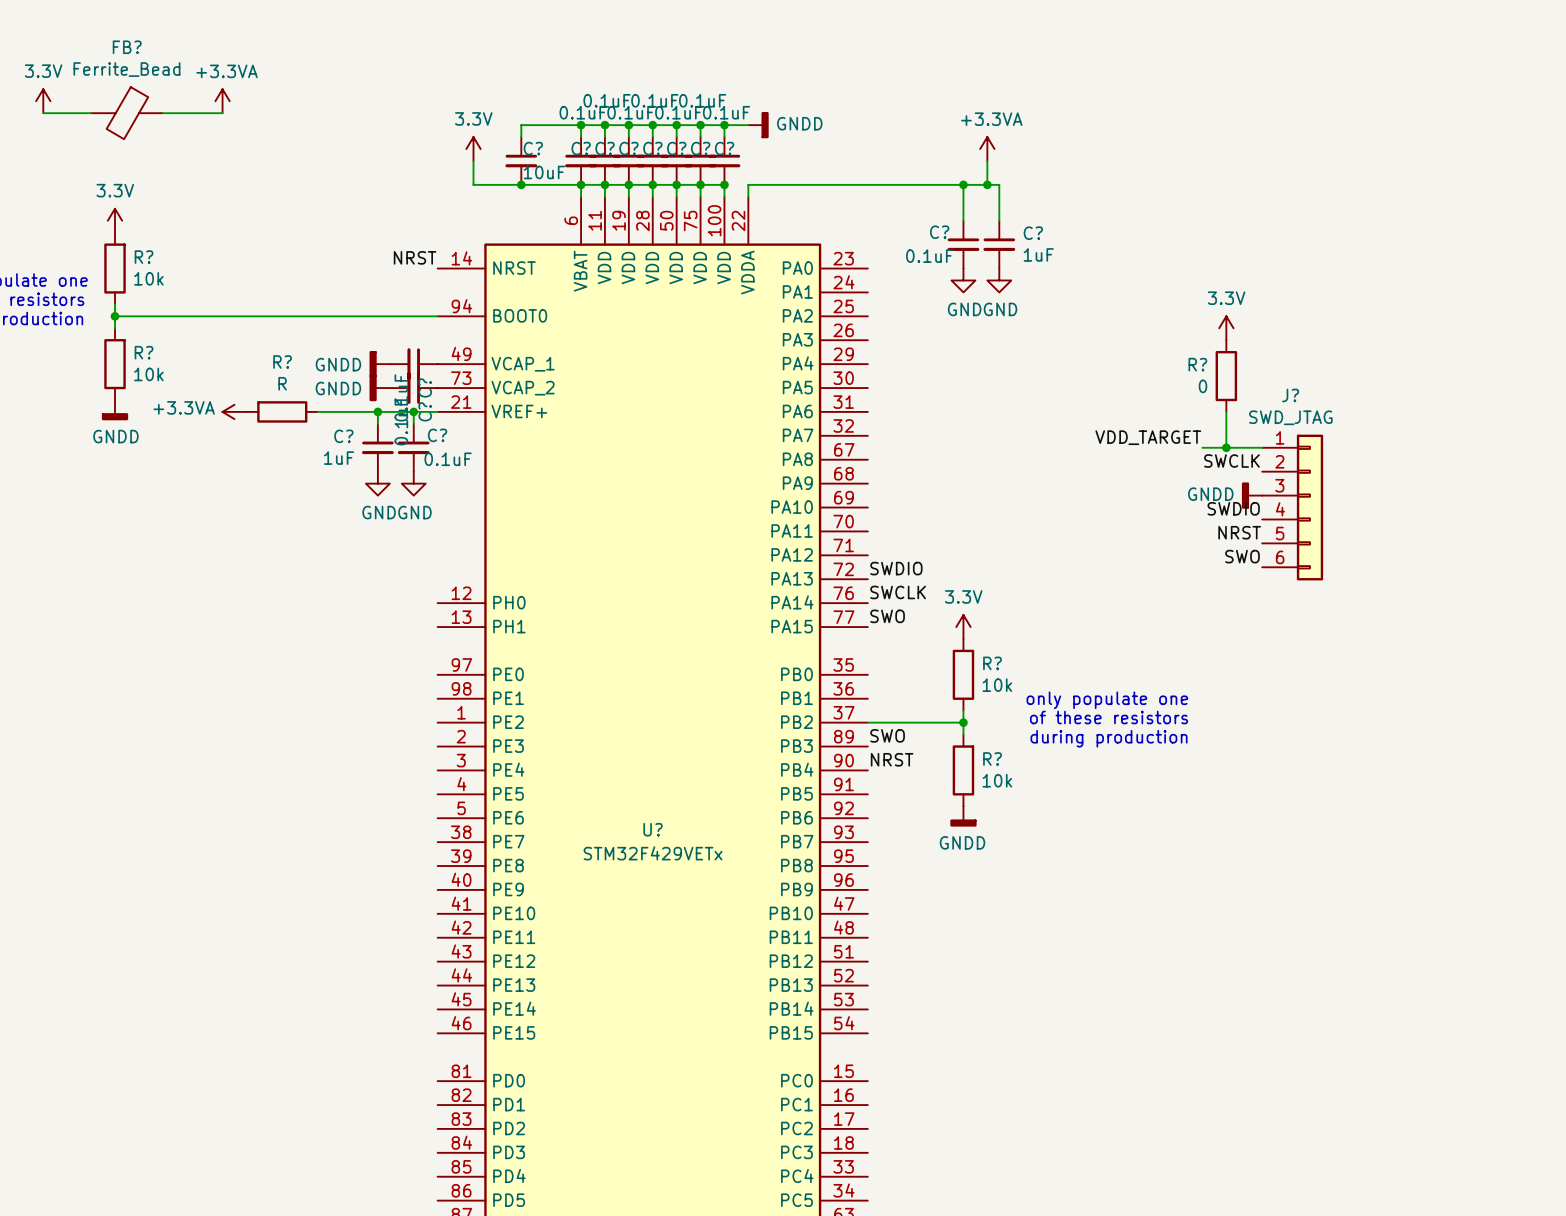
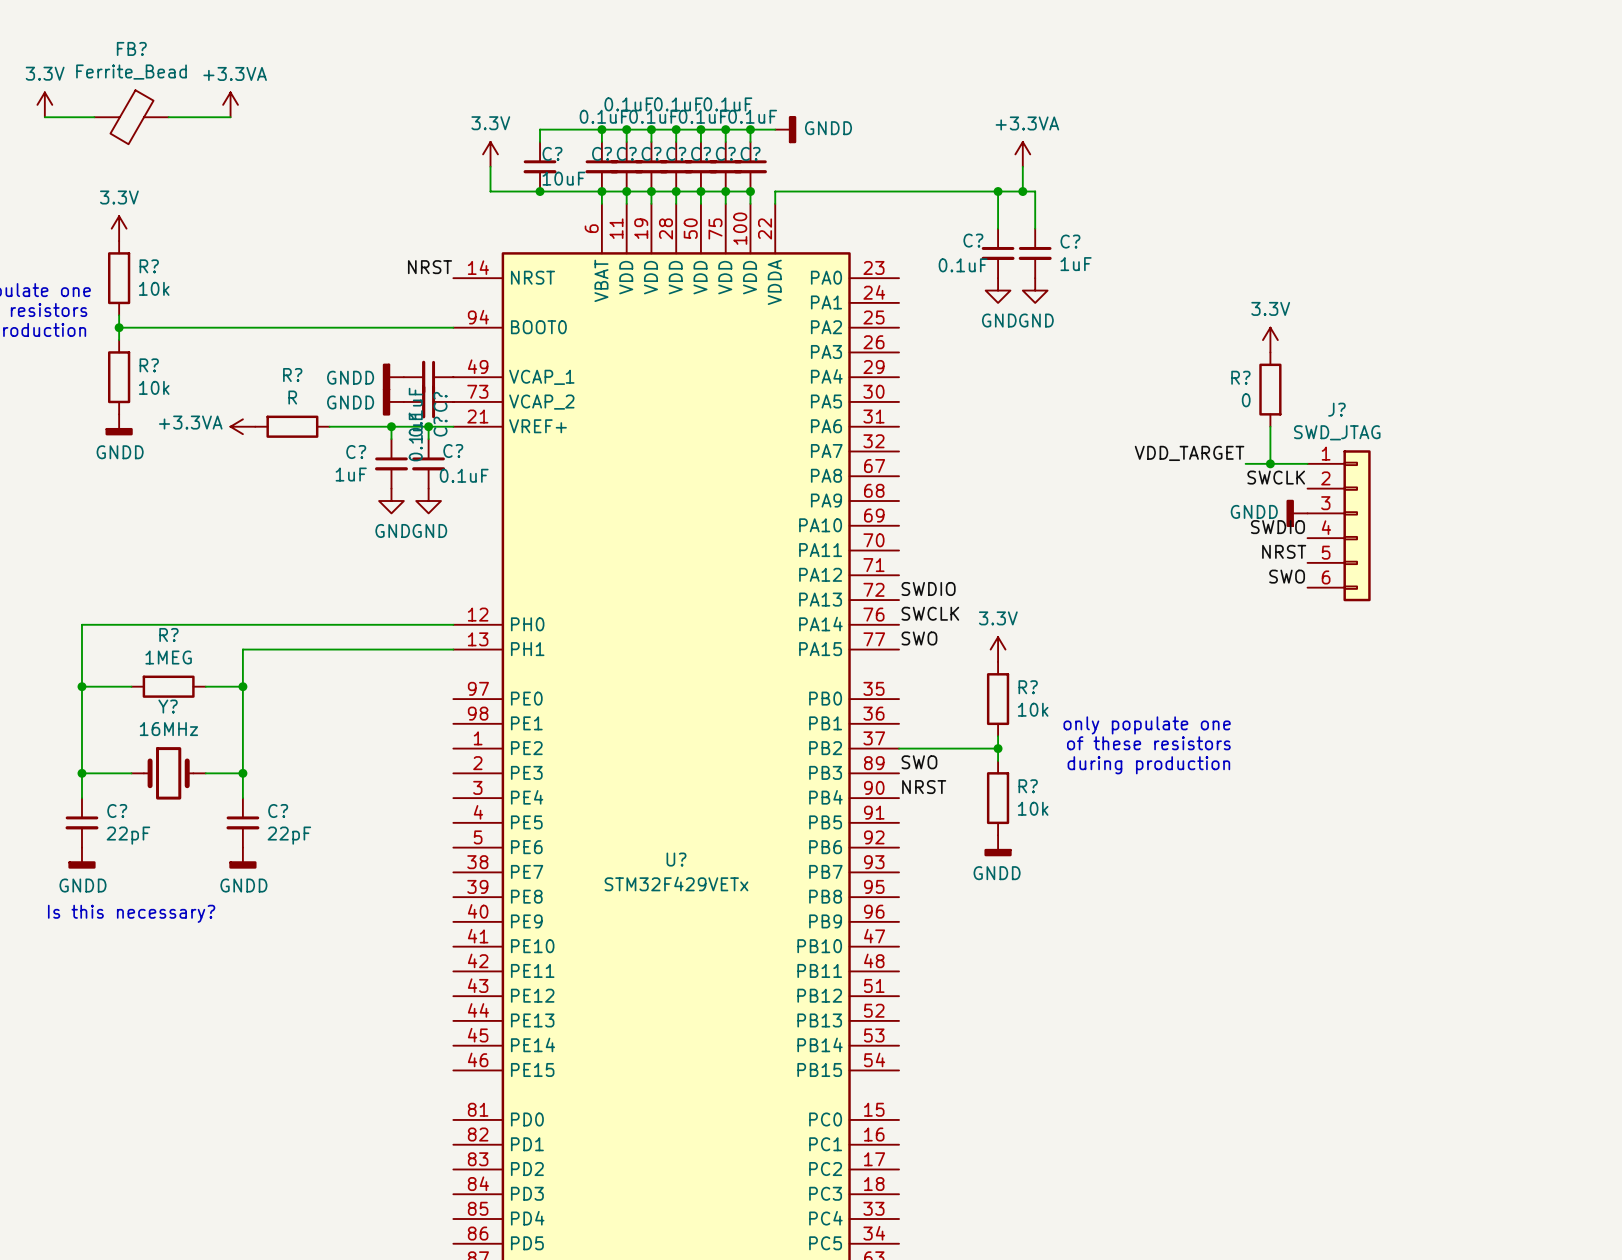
wire: none -> (453, 624) (81, 624) (81, 798)
wire: none -> (453, 649) (242, 649) (242, 798)
wire: none -> (81, 686) (131, 686)
junction: none -> (81, 686)
R?: none -> 1MEG (168, 686)
wire: none -> (205, 686) (242, 686)
junction: none -> (242, 686)
wire: none -> (81, 773) (131, 773)
junction: none -> (81, 773)
Y?: none -> 16MHz (168, 773)
wire: none -> (205, 773) (242, 773)
junction: none -> (242, 773)
C?: none -> 22pF (81, 822)
C?: none -> 22pF (242, 822)
power symbol: none -> GNDD (81, 858)
power symbol: none -> GNDD (242, 858)
text: none -> Is this necessary? (131, 913)

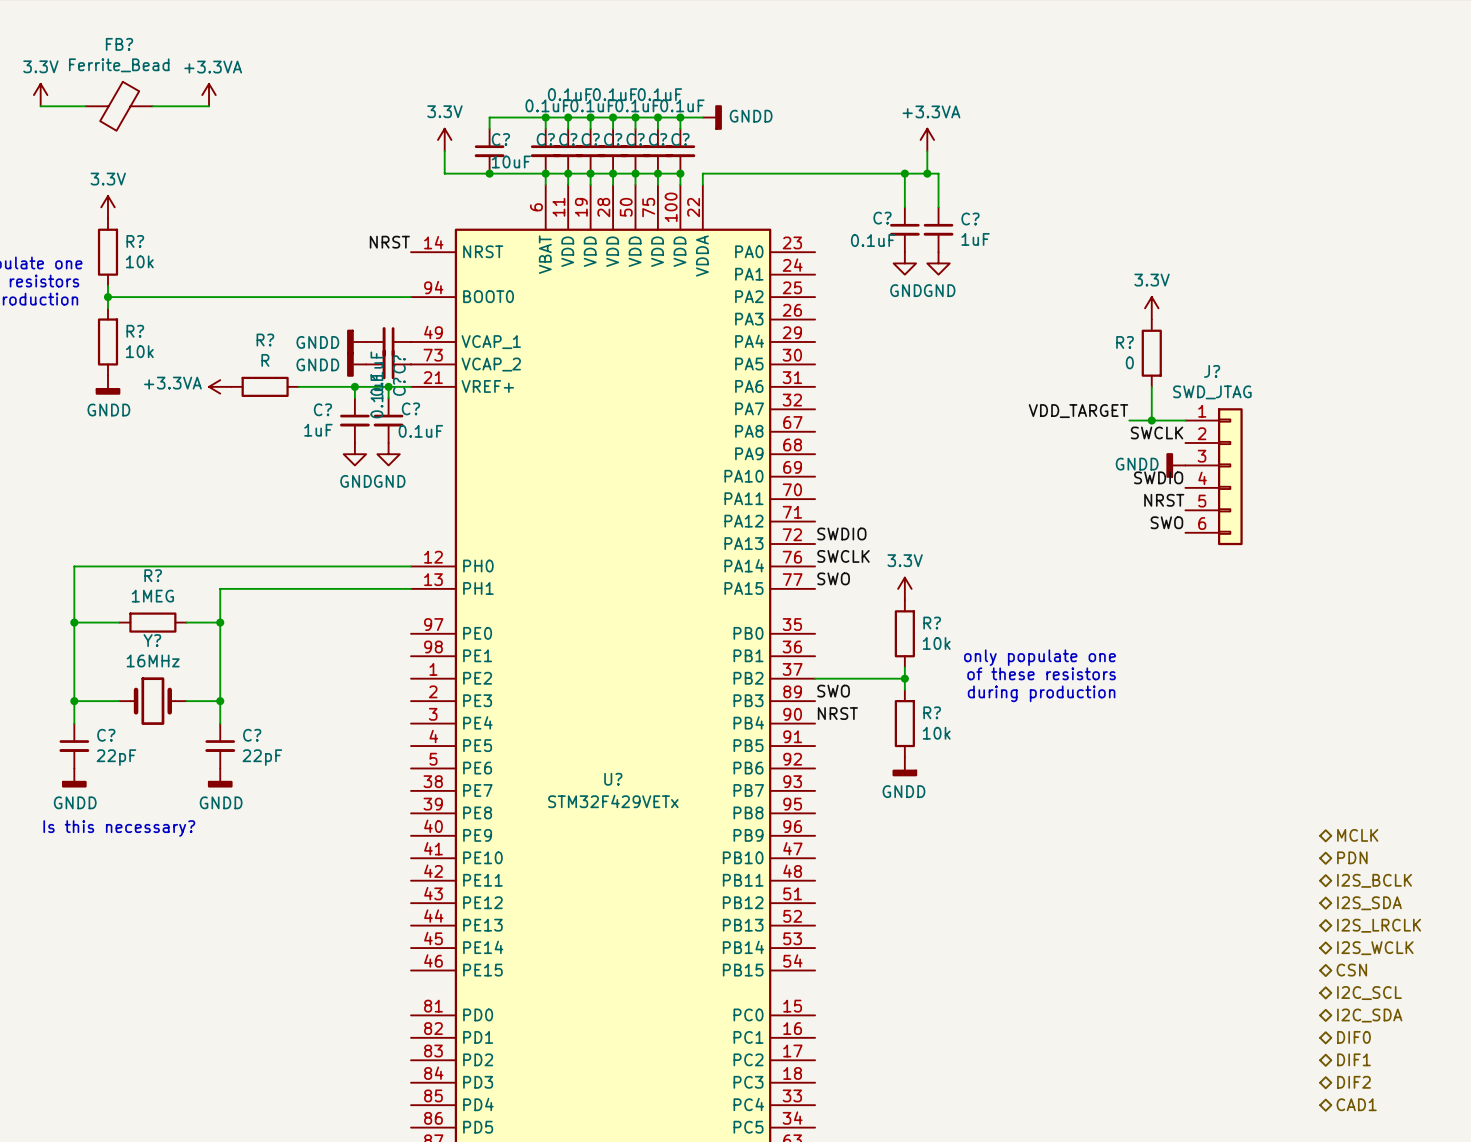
hierarchical label: none -> MCLK (1357, 835)
hierarchical label: none -> PDN (1352, 857)
hierarchical label: none -> I2S_BCLK (1374, 880)
hierarchical label: none -> I2S_SDA (1369, 903)
hierarchical label: none -> I2S_LRCLK (1379, 925)
hierarchical label: none -> I2S_WCLK (1375, 948)
hierarchical label: none -> CSN (1351, 970)
hierarchical label: none -> I2C_SCL (1369, 993)
hierarchical label: none -> I2C_SDA (1369, 1015)
hierarchical label: none -> DIF0 (1353, 1037)
hierarchical label: none -> DIF1 (1353, 1059)
hierarchical label: none -> DIF2 (1353, 1082)
hierarchical label: none -> CAD1 (1356, 1104)

